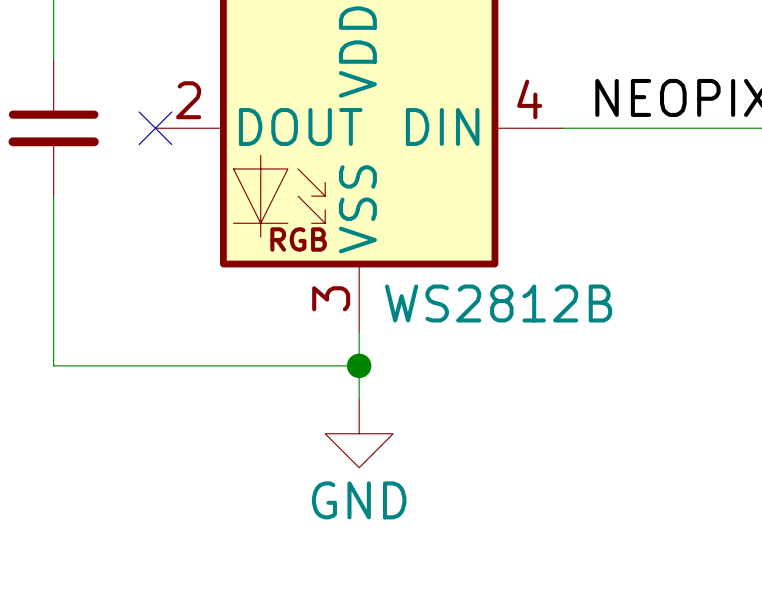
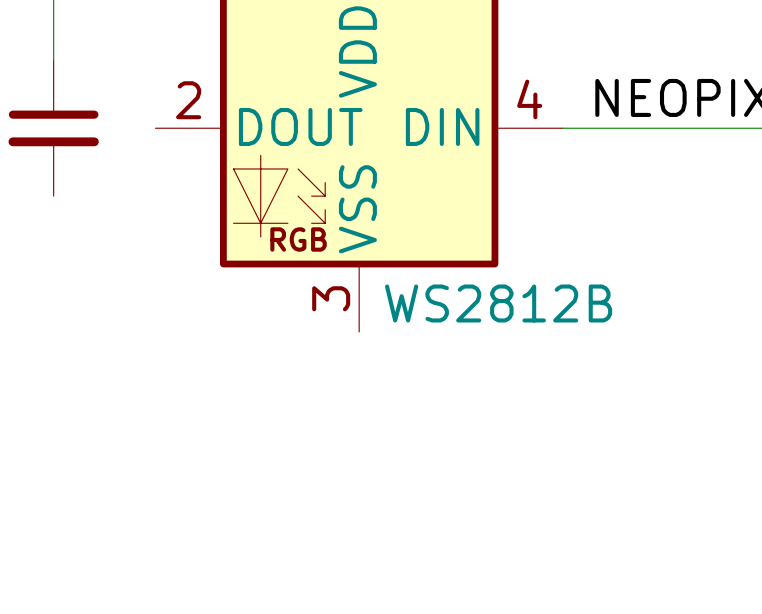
no-connect mark: (155, 128) -> none
wire: (53, 196) (53, 365) (359, 365) -> none
wire: (359, 331) (359, 399) -> none
junction: (359, 365) -> none
power symbol: GND (359, 433) -> none

